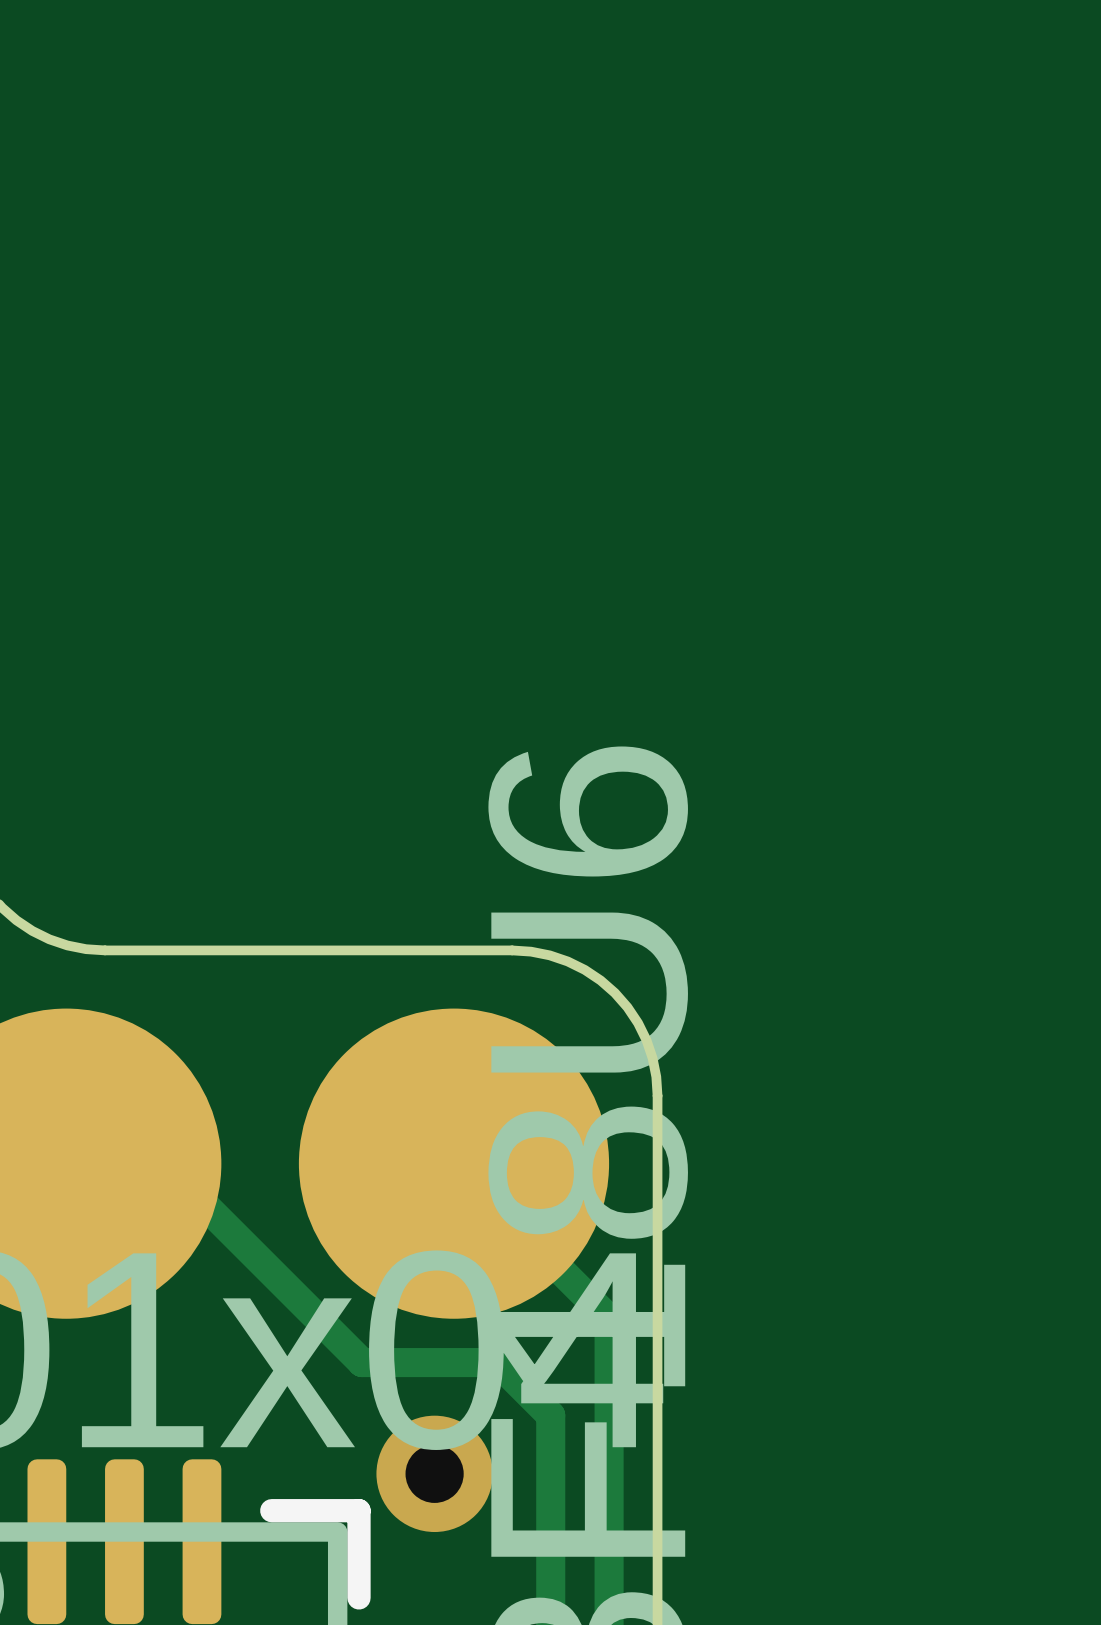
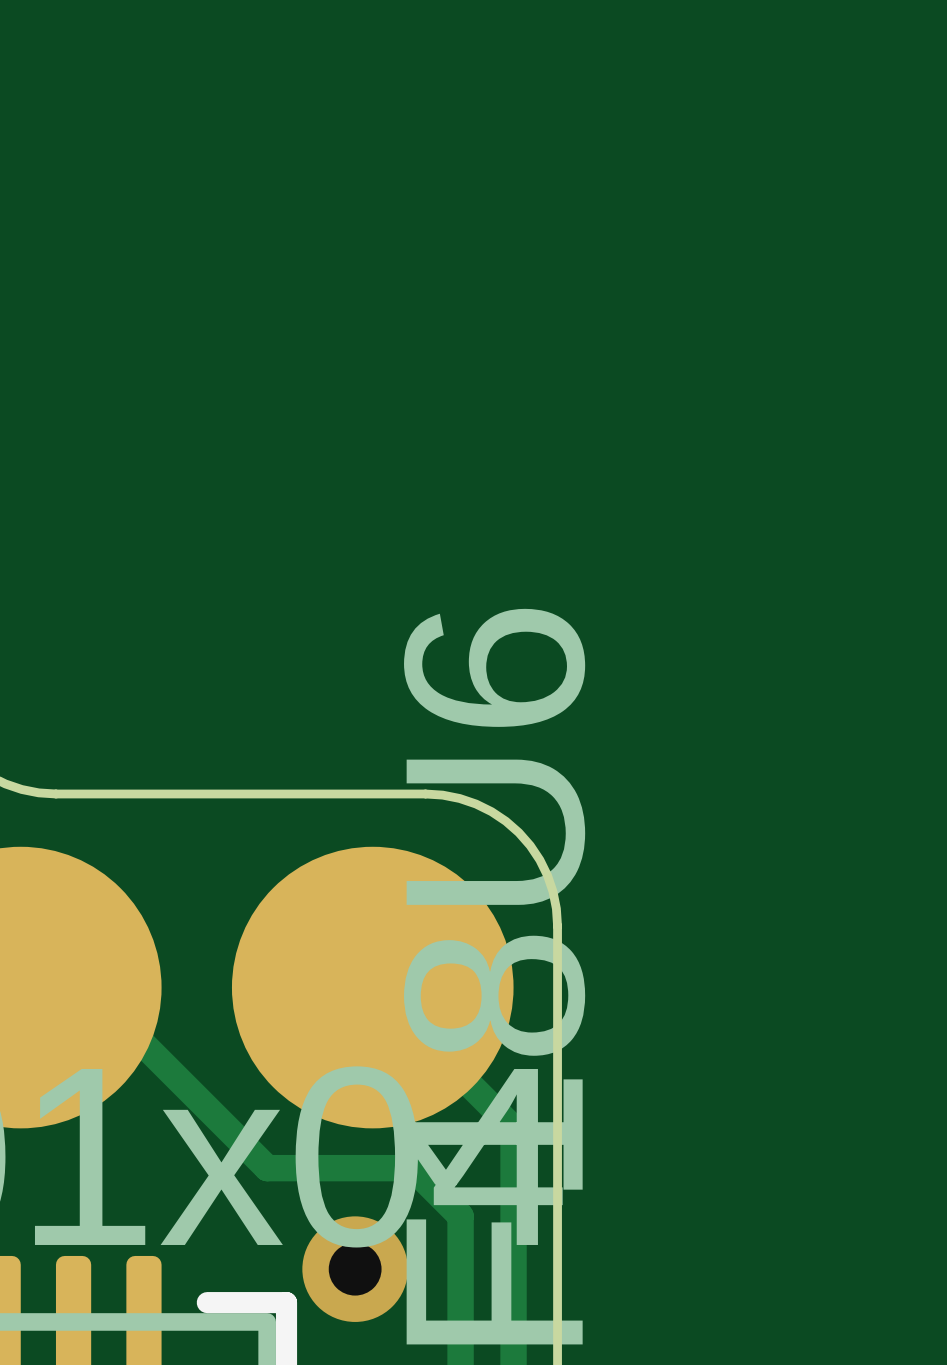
track: (138, 1163) (163, 1163) (362, 1362) -> (86, 987) (267, 1168) (289, 1168)

